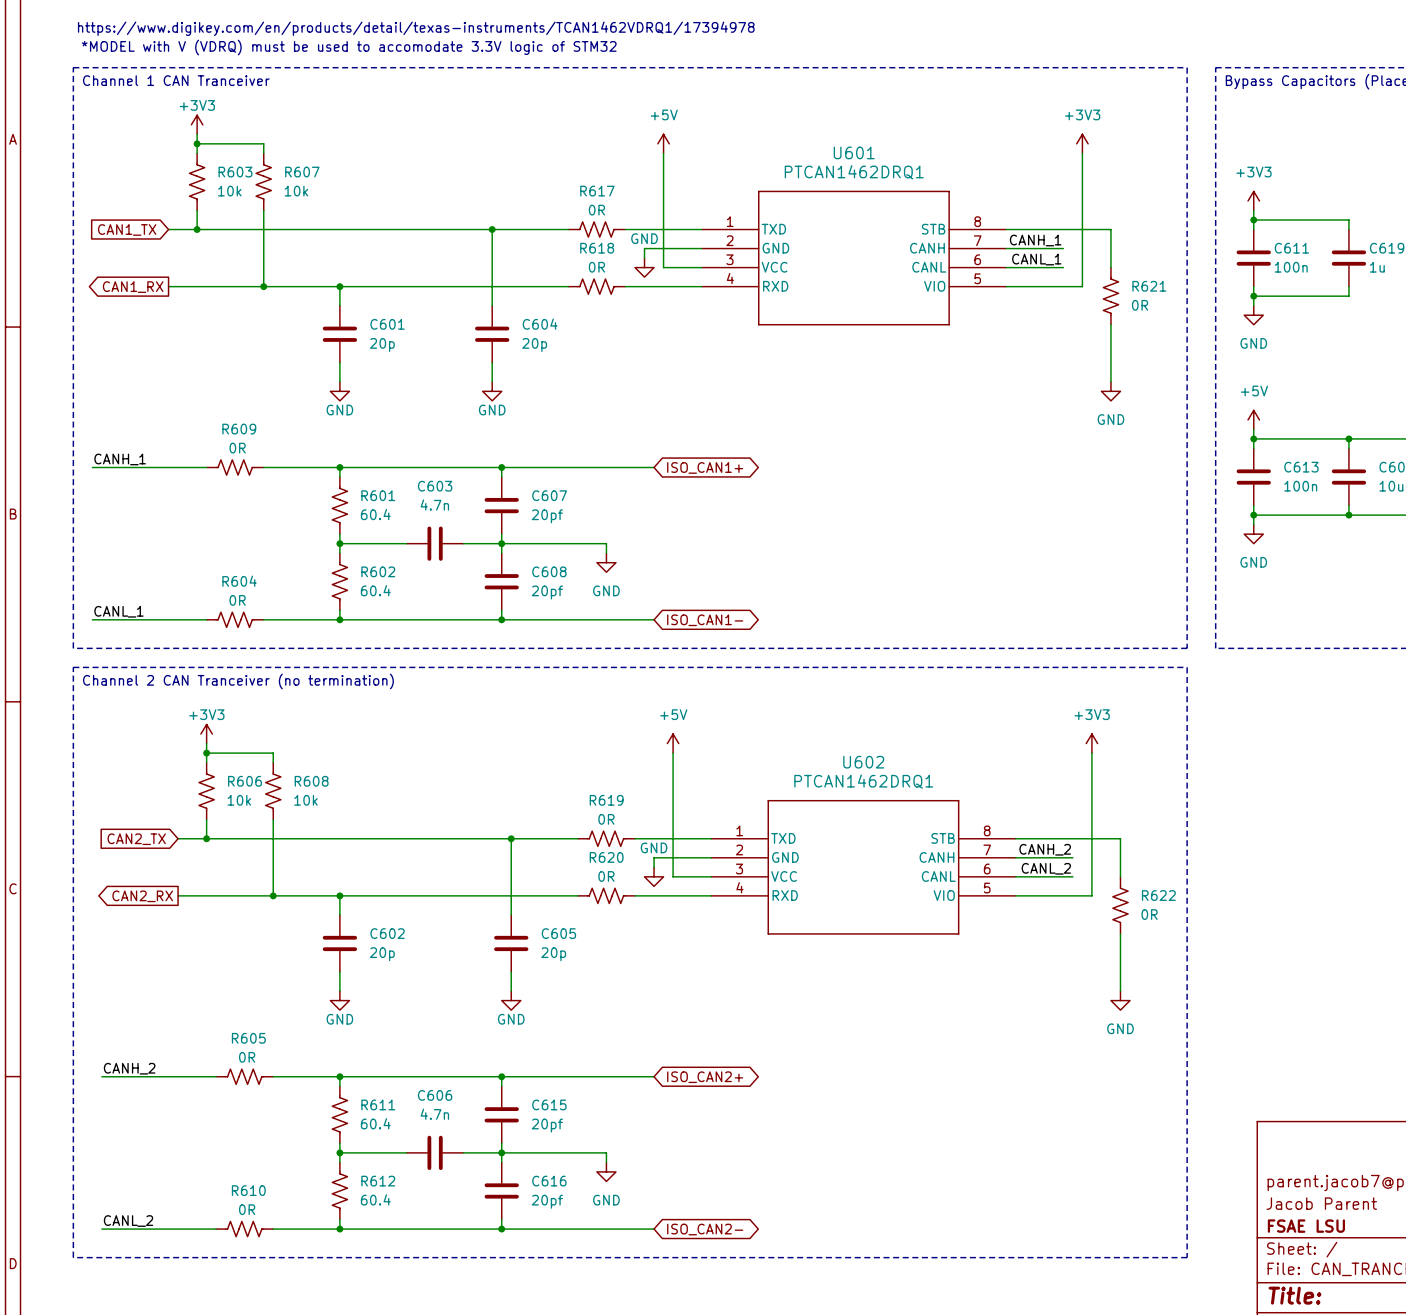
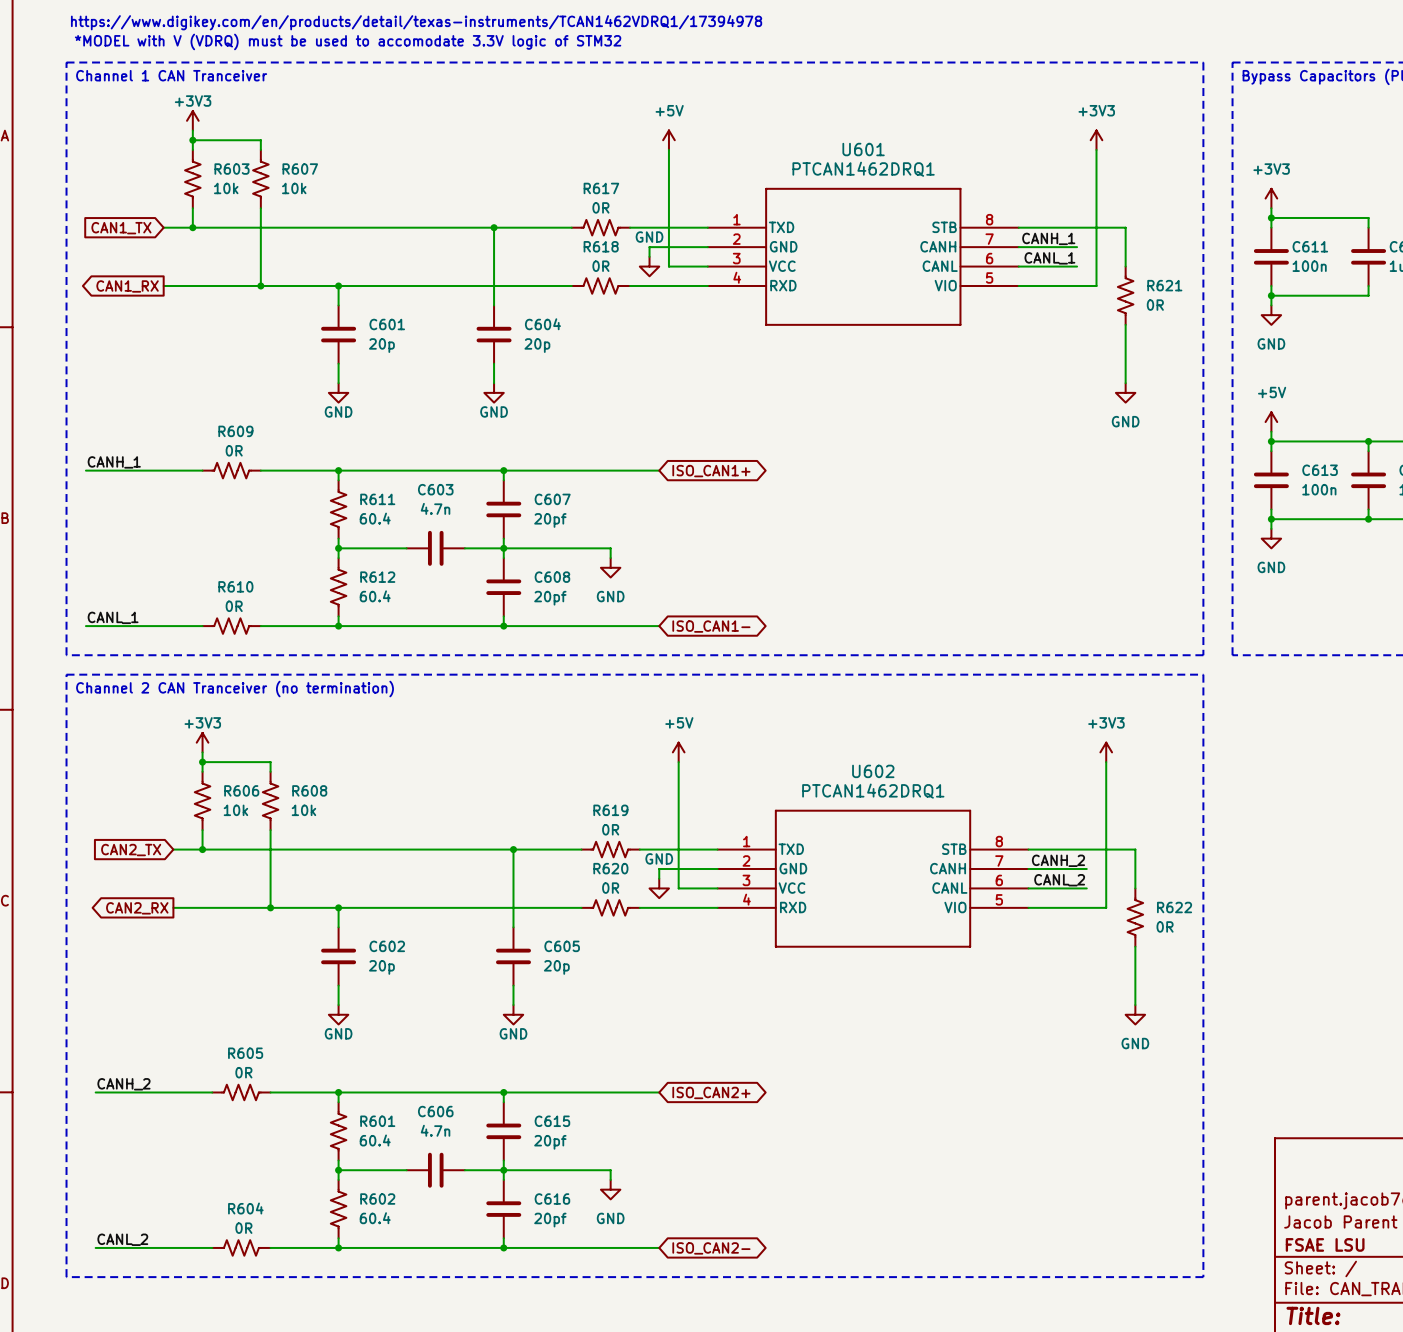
R601 name: R601 (378, 495) -> R611 (377, 499)
R602 name: R602 (378, 571) -> R612 (377, 577)
R604 name: R604 (239, 581) -> R610 (235, 586)
R611 name: R611 (378, 1104) -> R601 (377, 1121)
R612 name: R612 (378, 1181) -> R602 (377, 1199)
R610 name: R610 (248, 1190) -> R604 (245, 1208)

